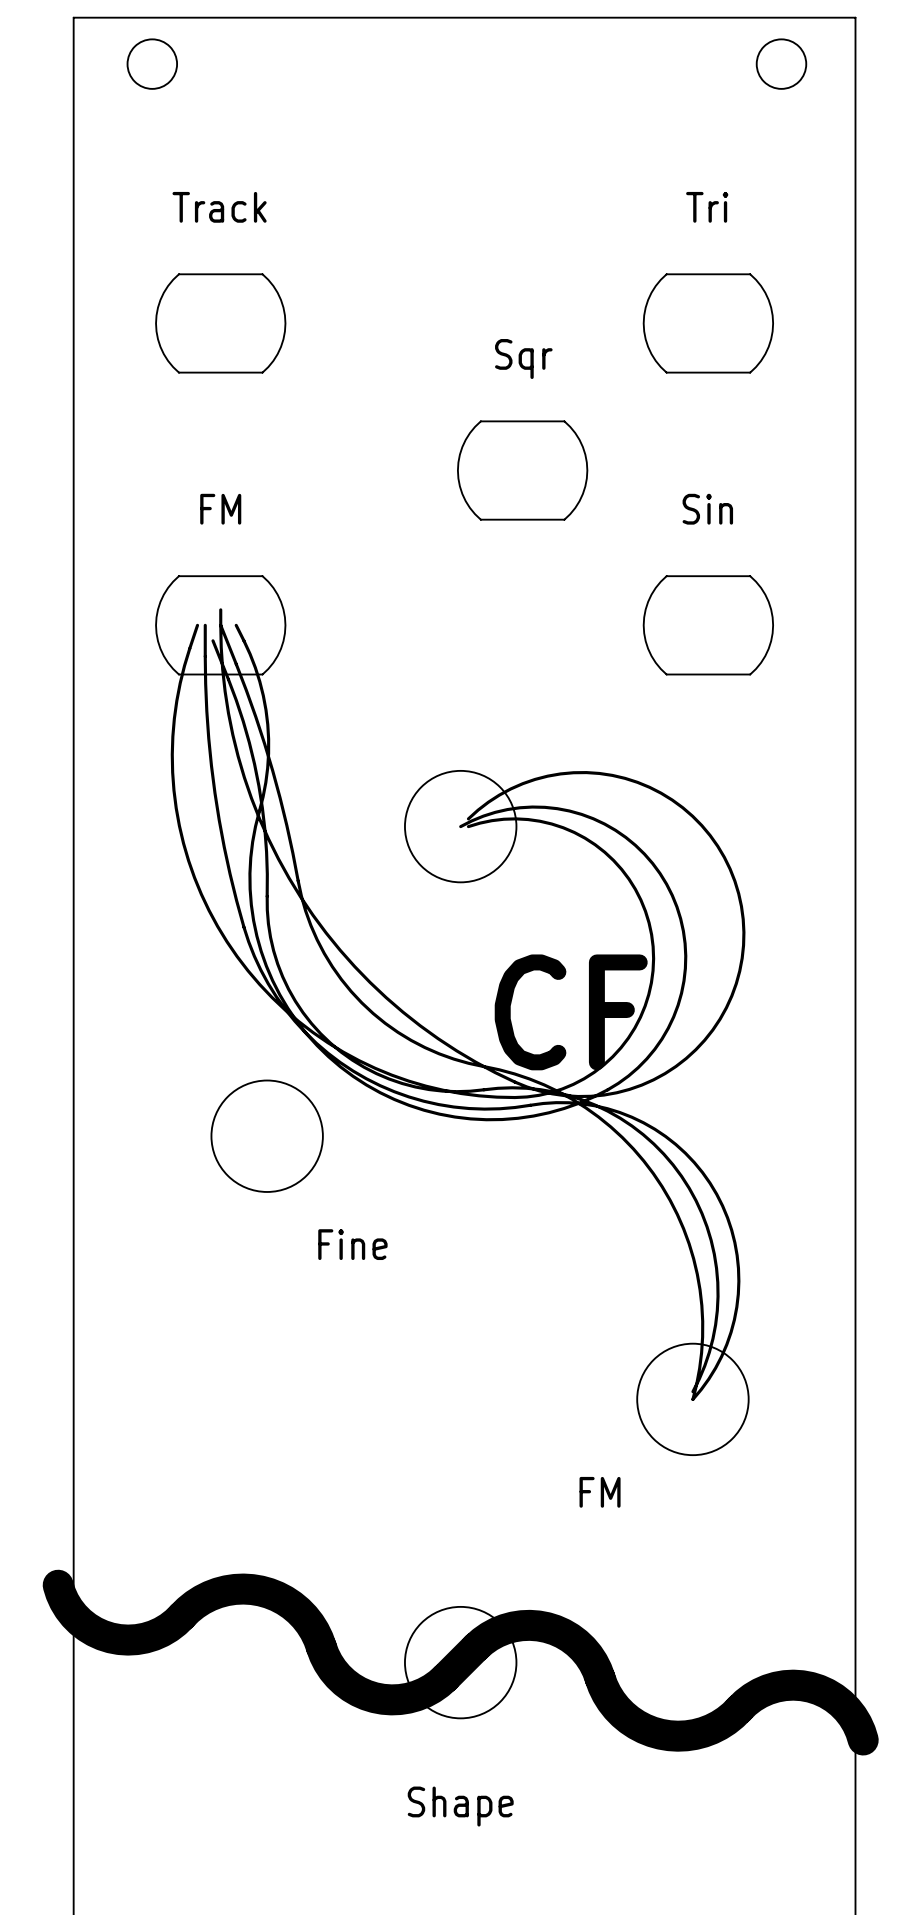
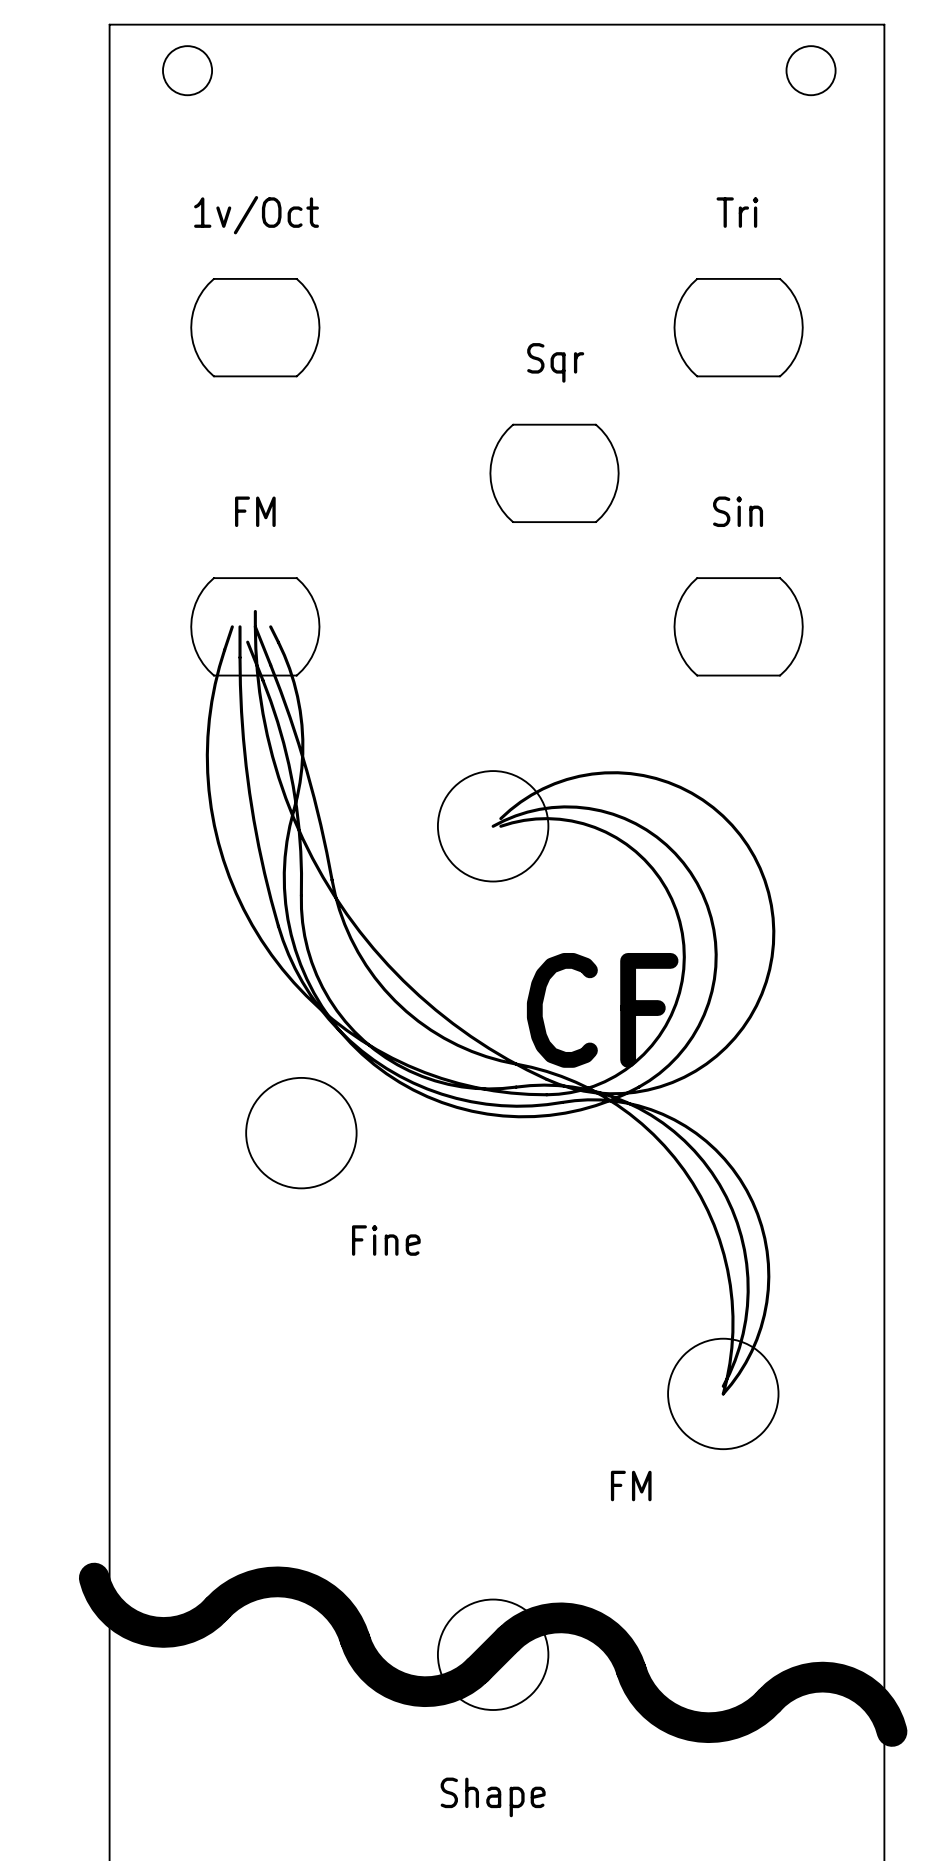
text: Track (219, 207) -> 1v/Oct (256, 215)

